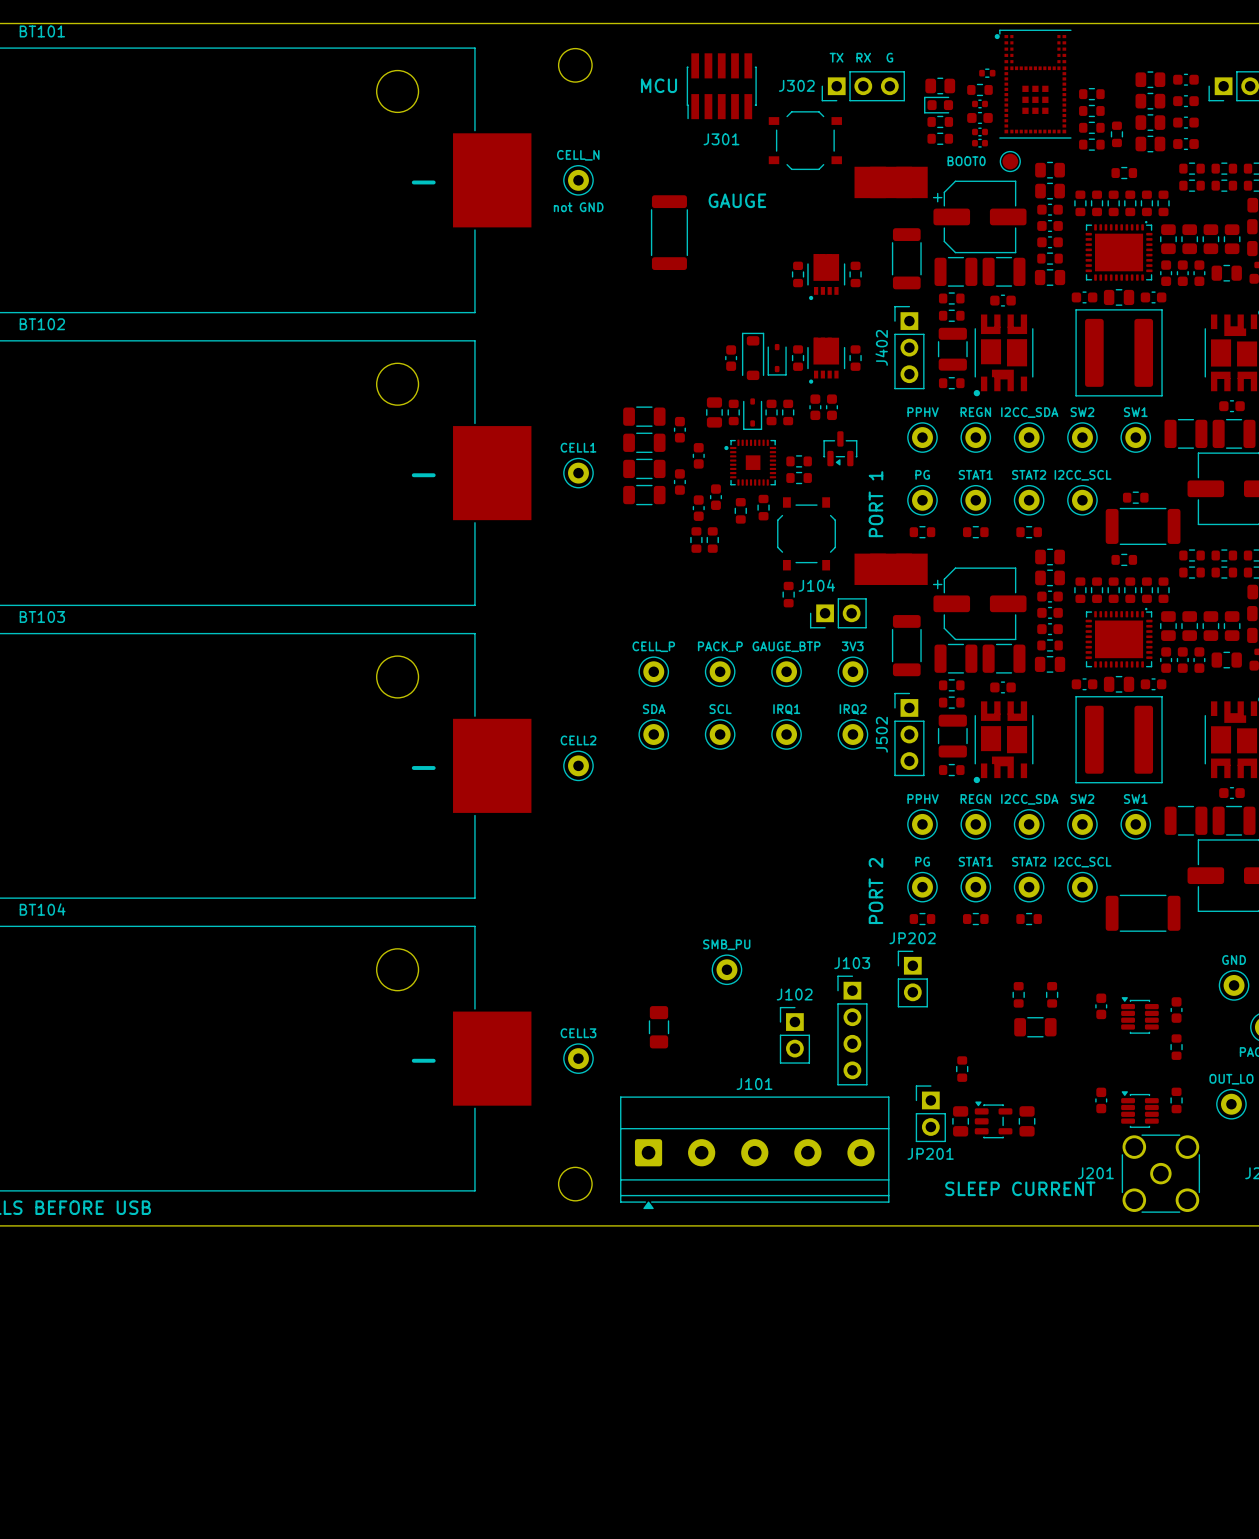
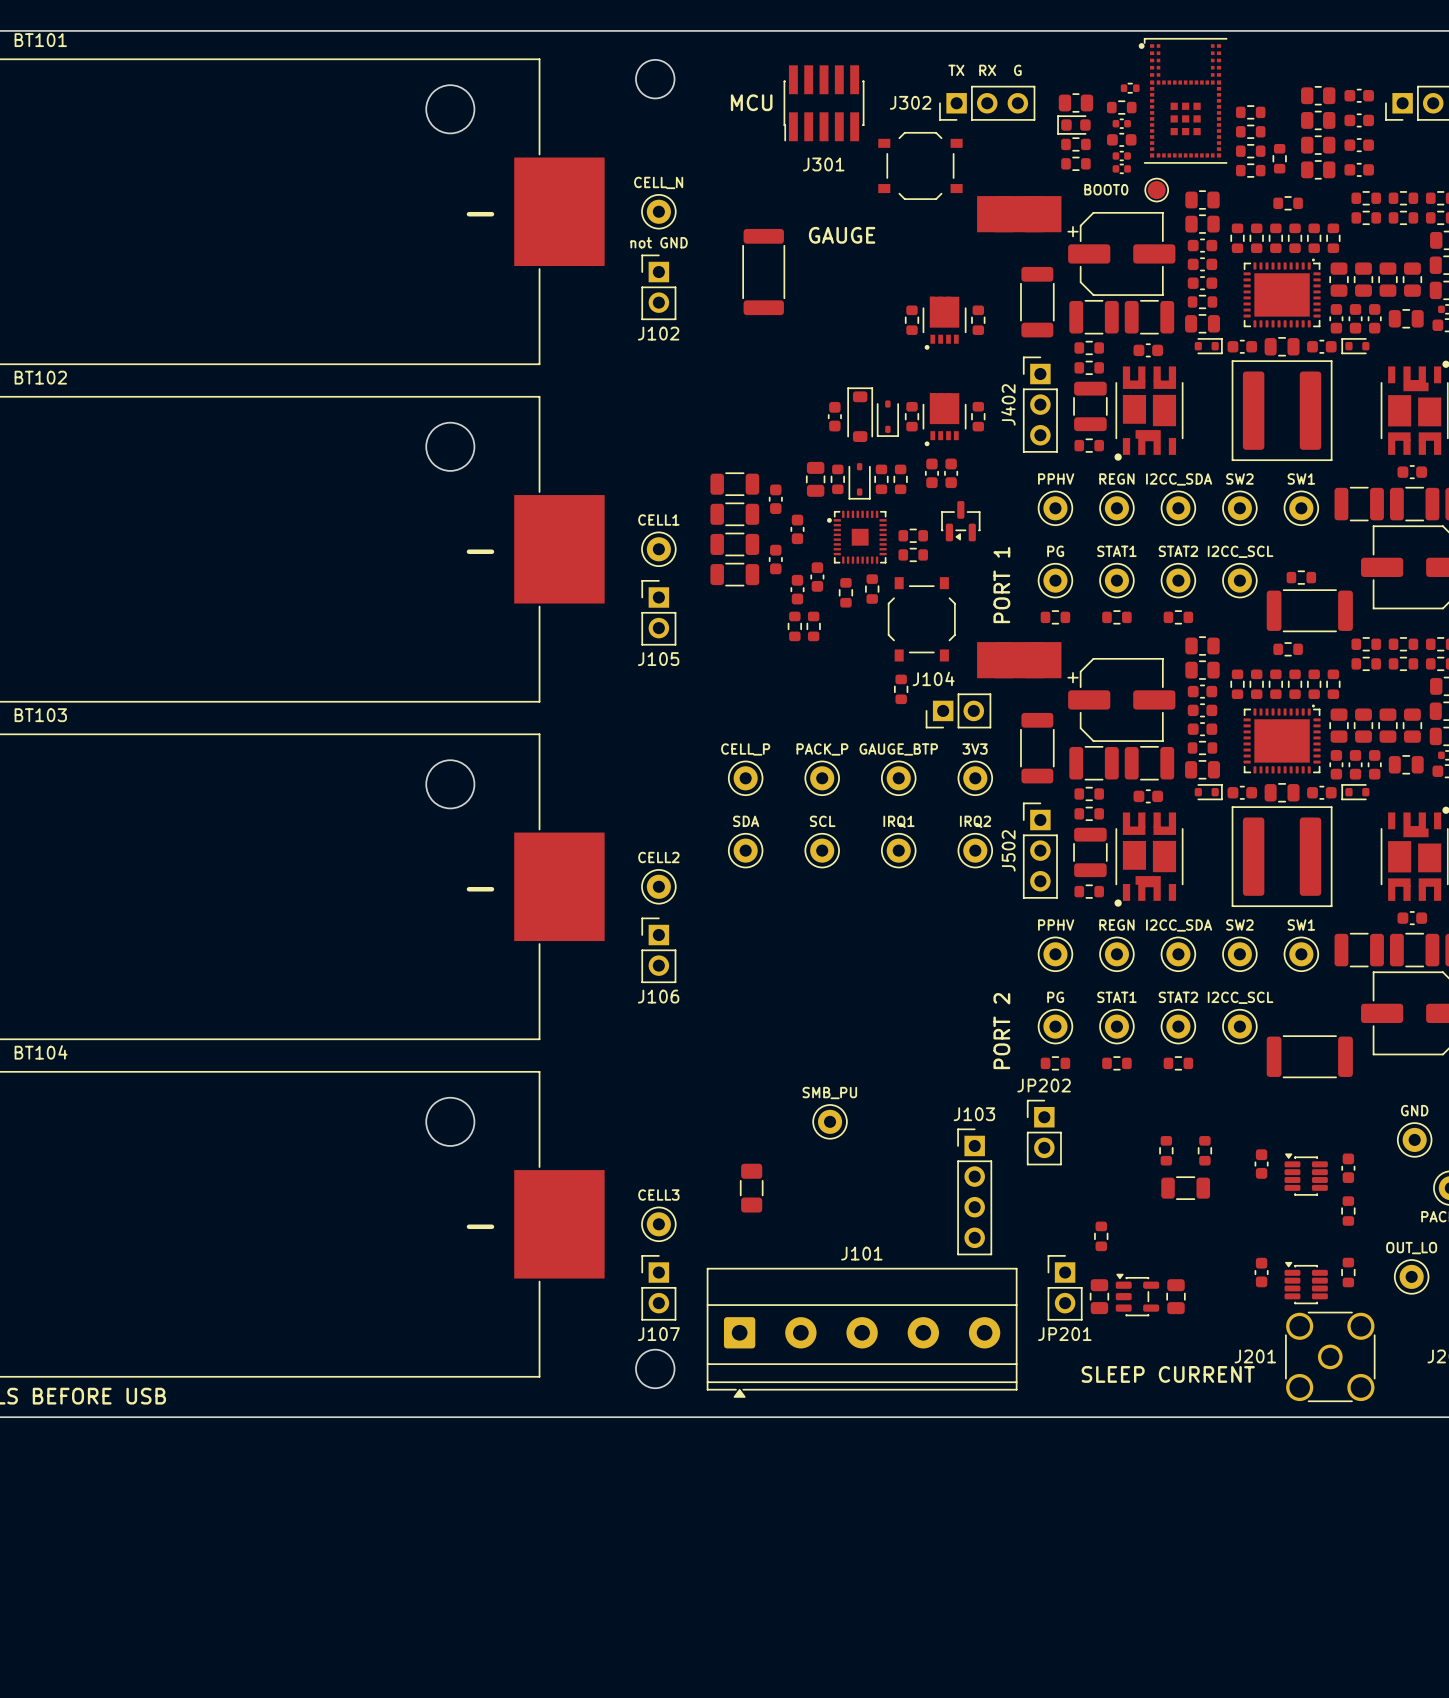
part: none -> (1208, 346)
part: none -> (1355, 346)
J105: none -> (658, 612)
part: none -> (1208, 792)
part: none -> (1355, 792)
J106: none -> (658, 950)
J102 name position: J102 (794, 994) -> J102 (658, 333)
J102 position: (794, 1035) -> (658, 287)
J107: none -> (658, 1287)

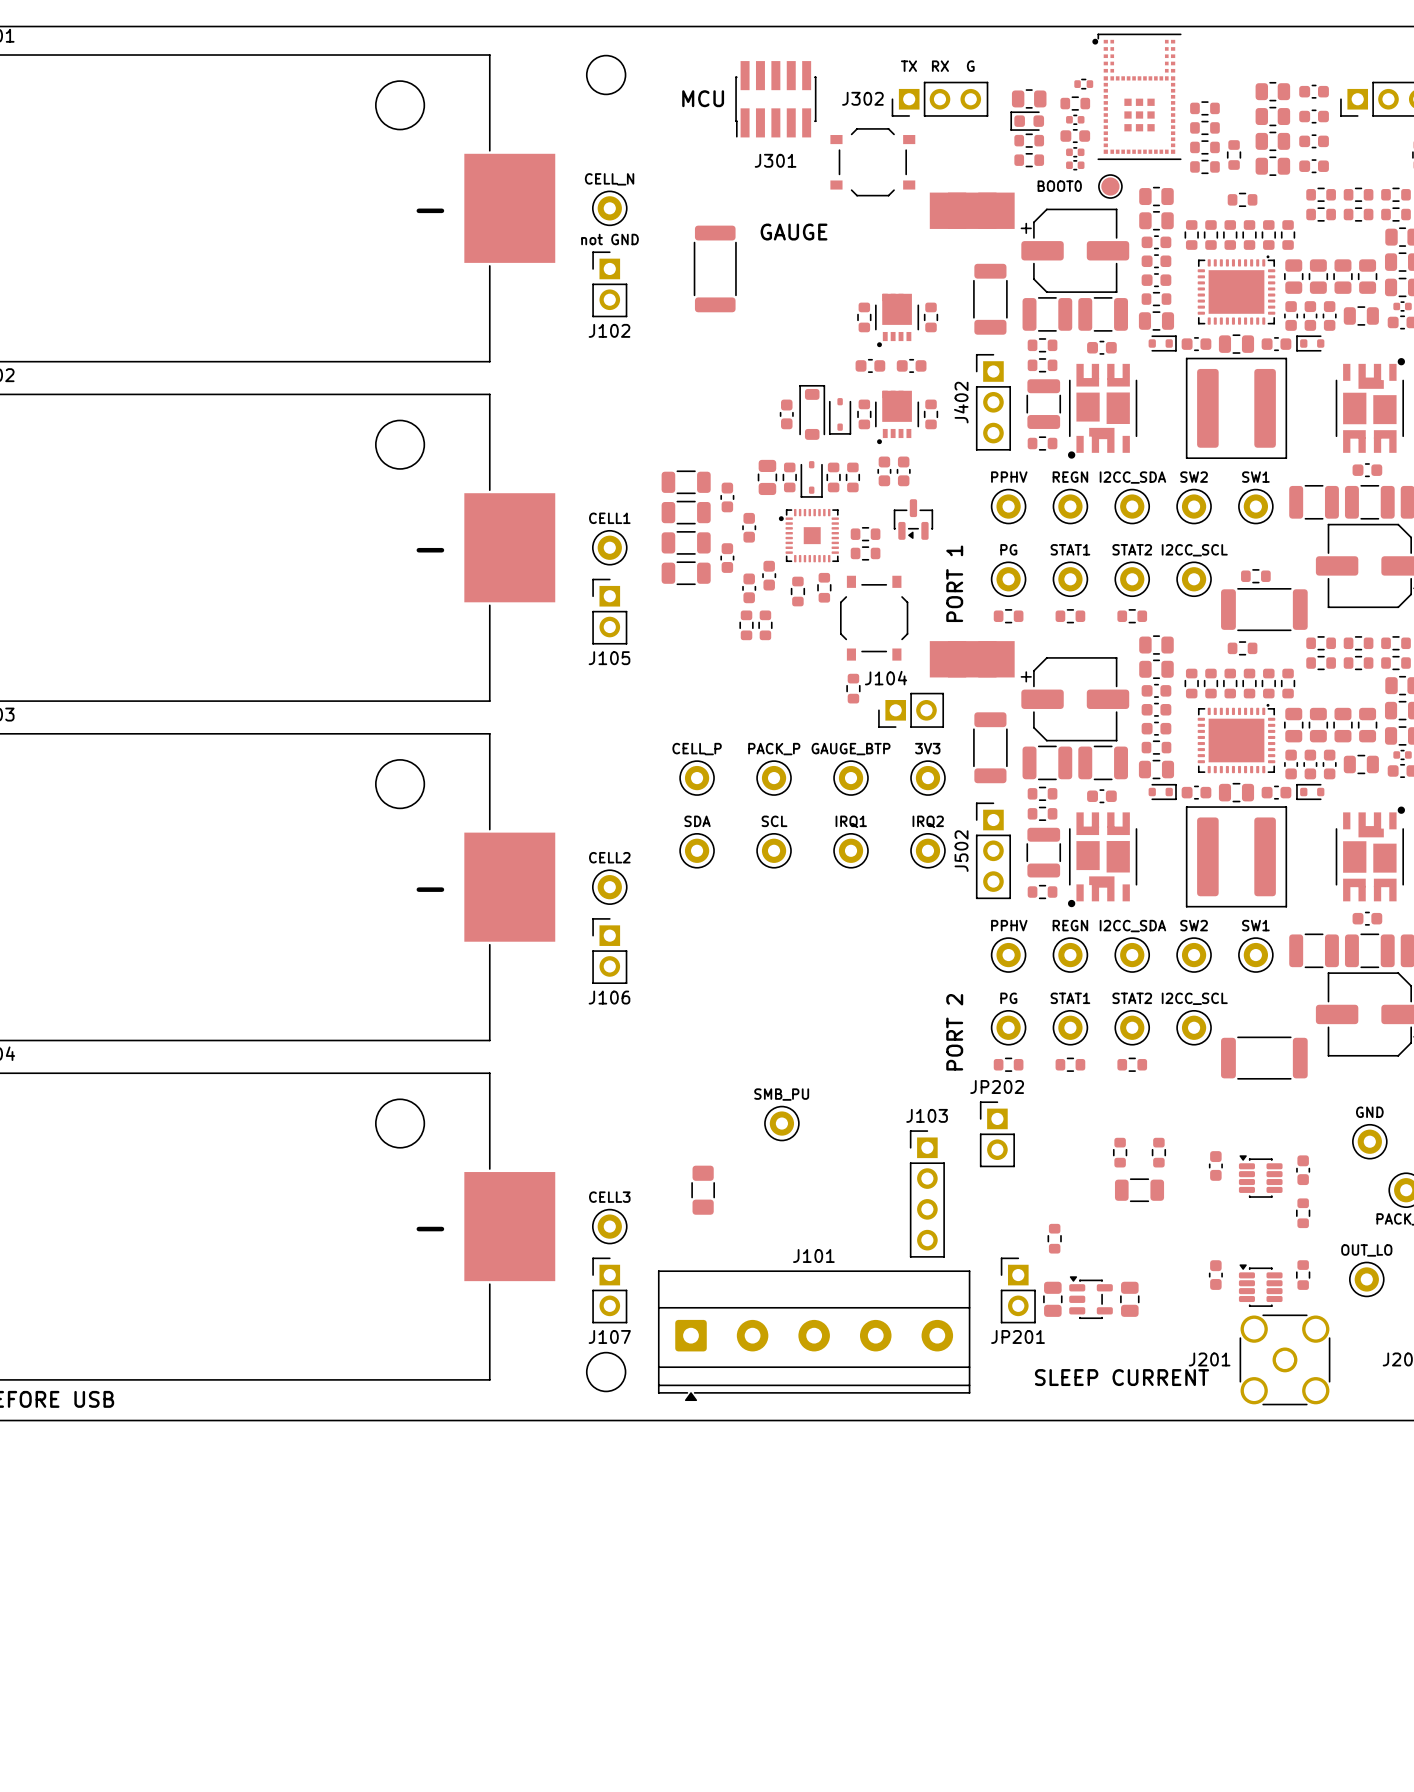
part: none -> (870, 365)
part: none -> (911, 365)

